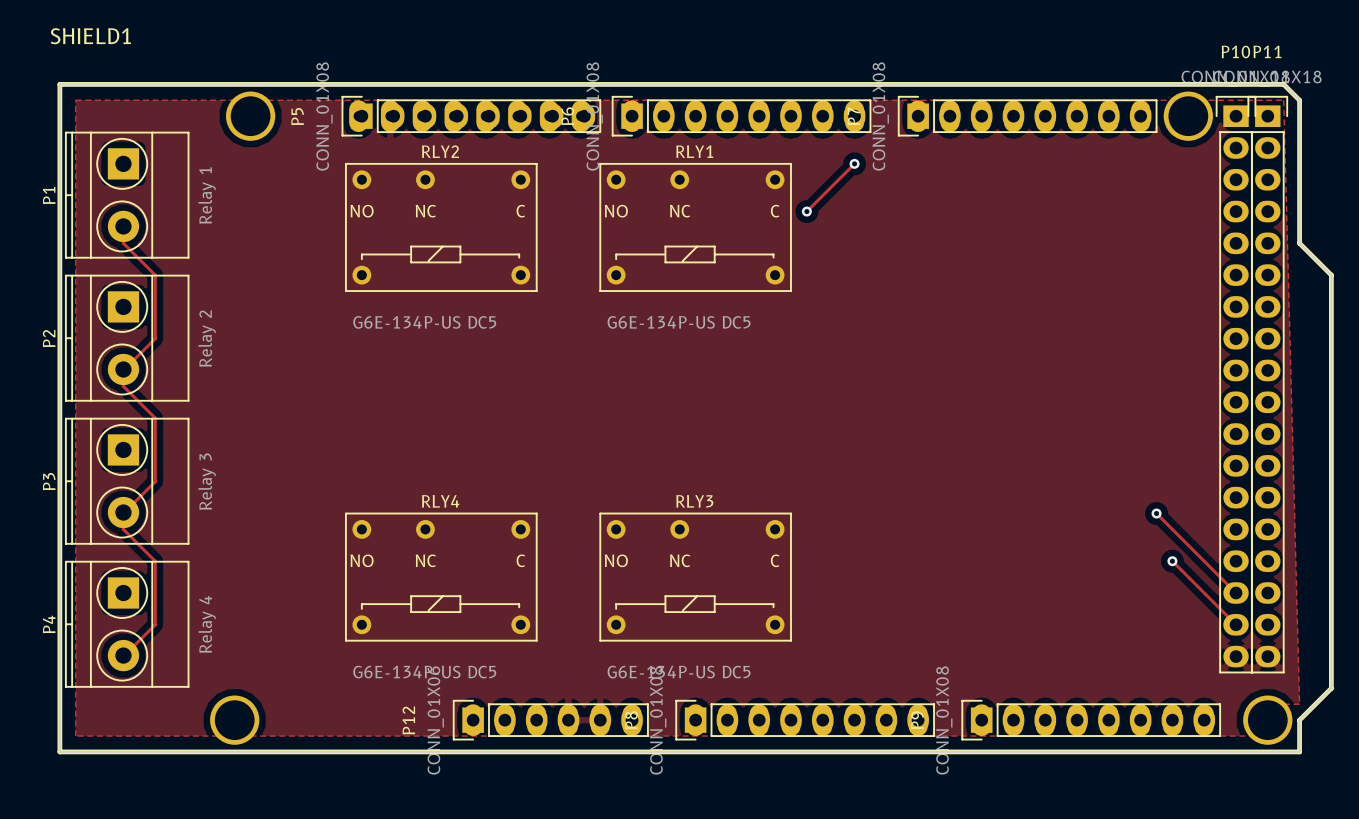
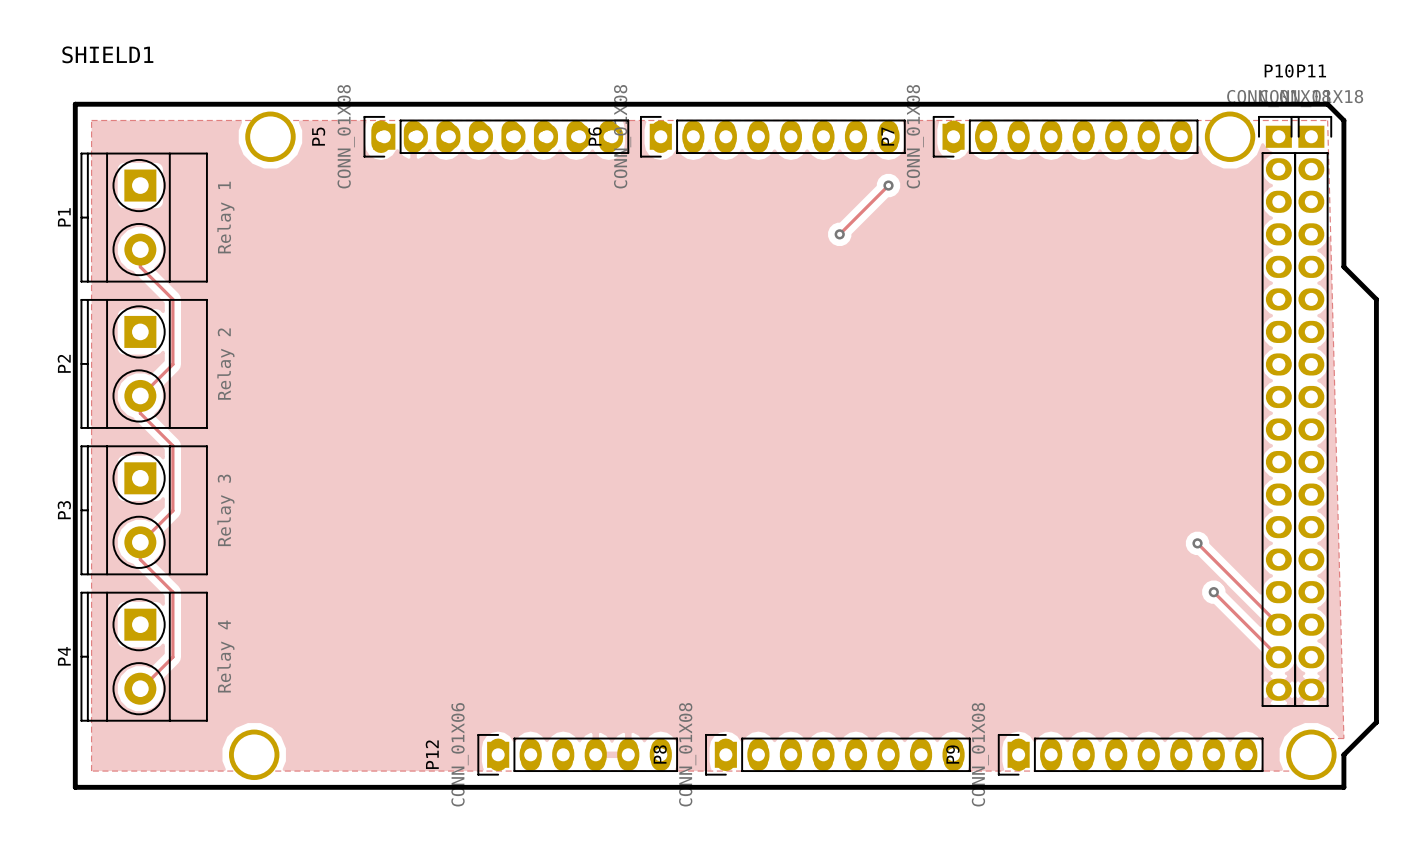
RLY2: G6E-134P-US DC5 (441, 227) -> none
RLY1: G6E-134P-US DC5 (695, 227) -> none
RLY4: G6E-134P-US DC5 (441, 577) -> none
RLY3: G6E-134P-US DC5 (695, 577) -> none

